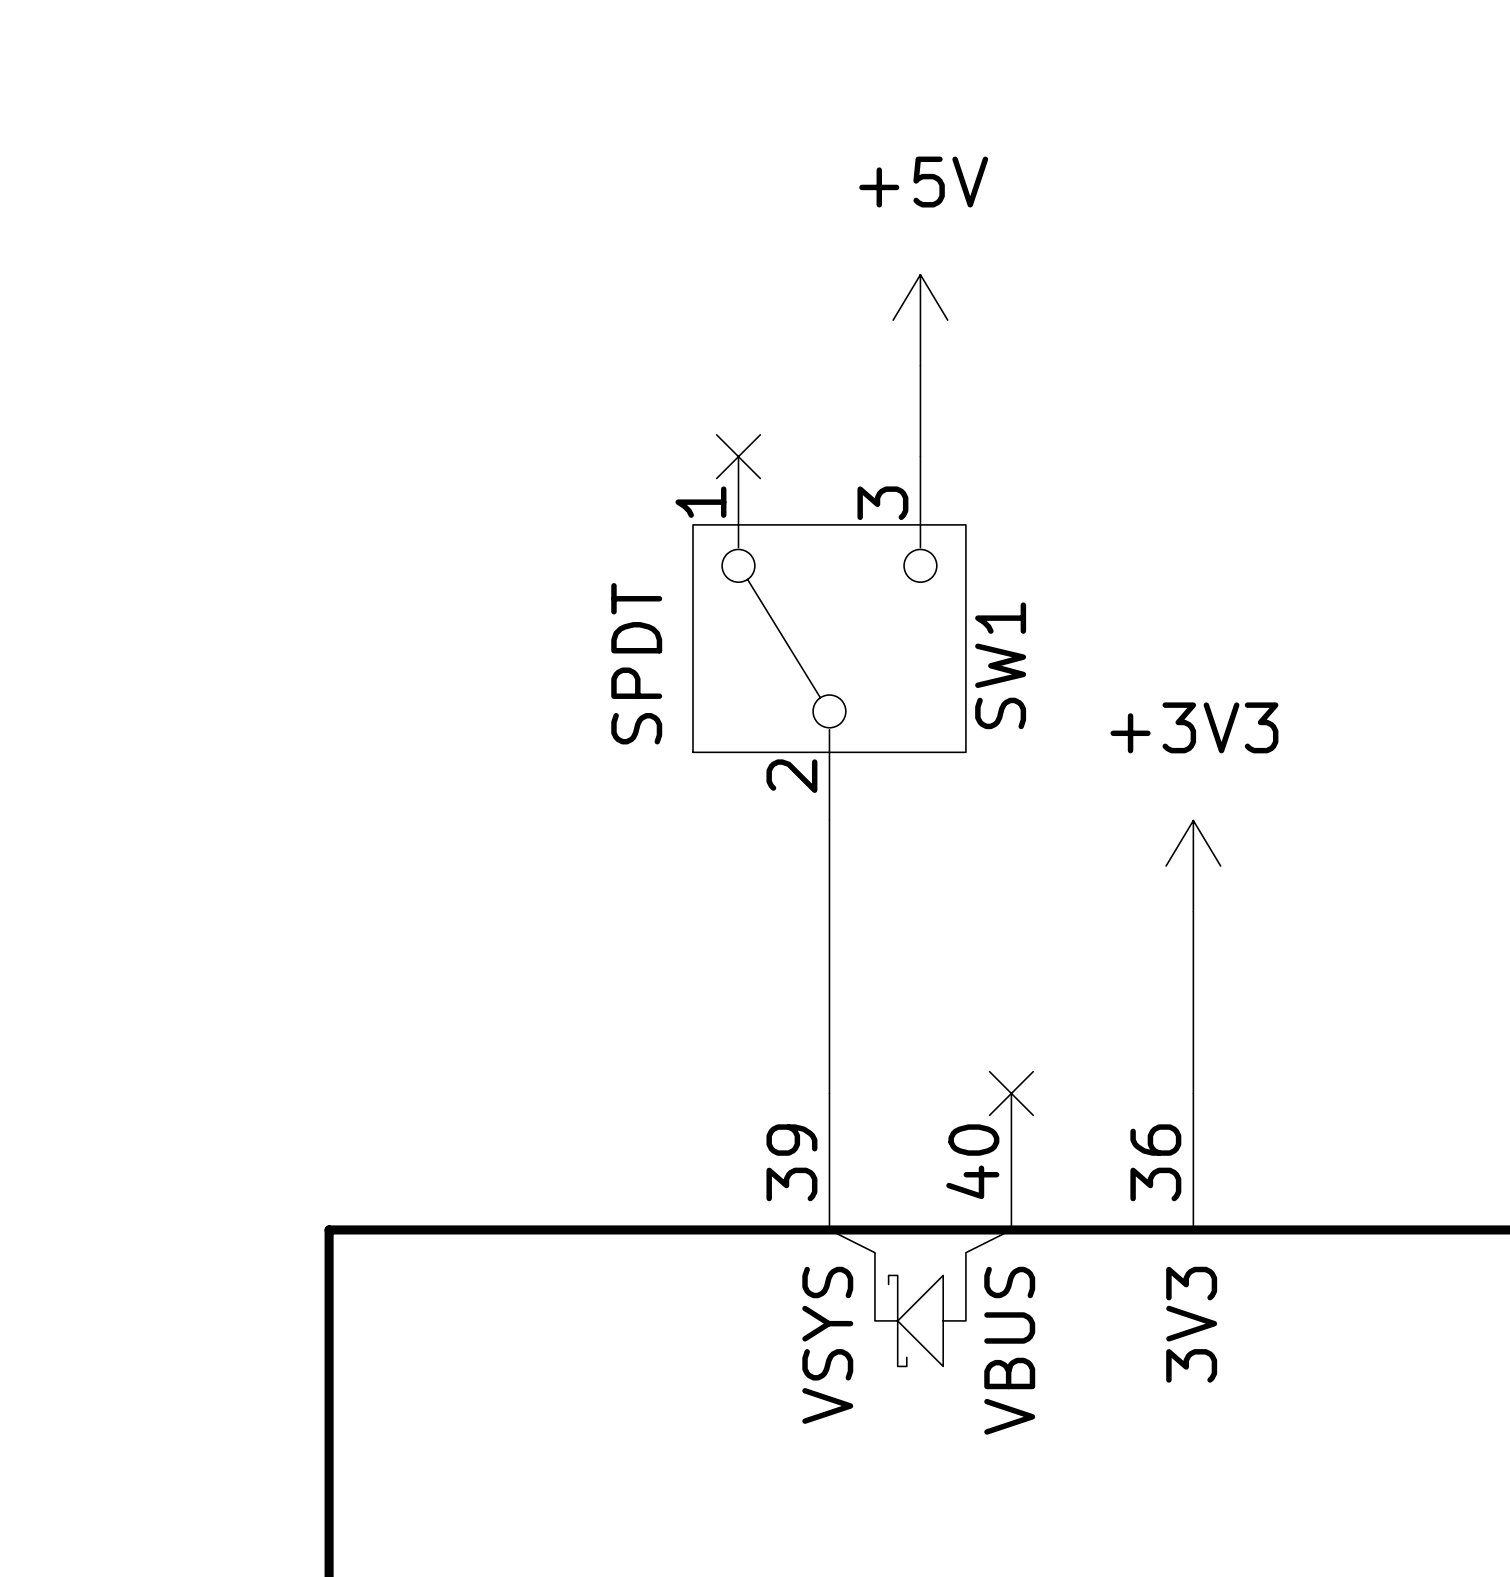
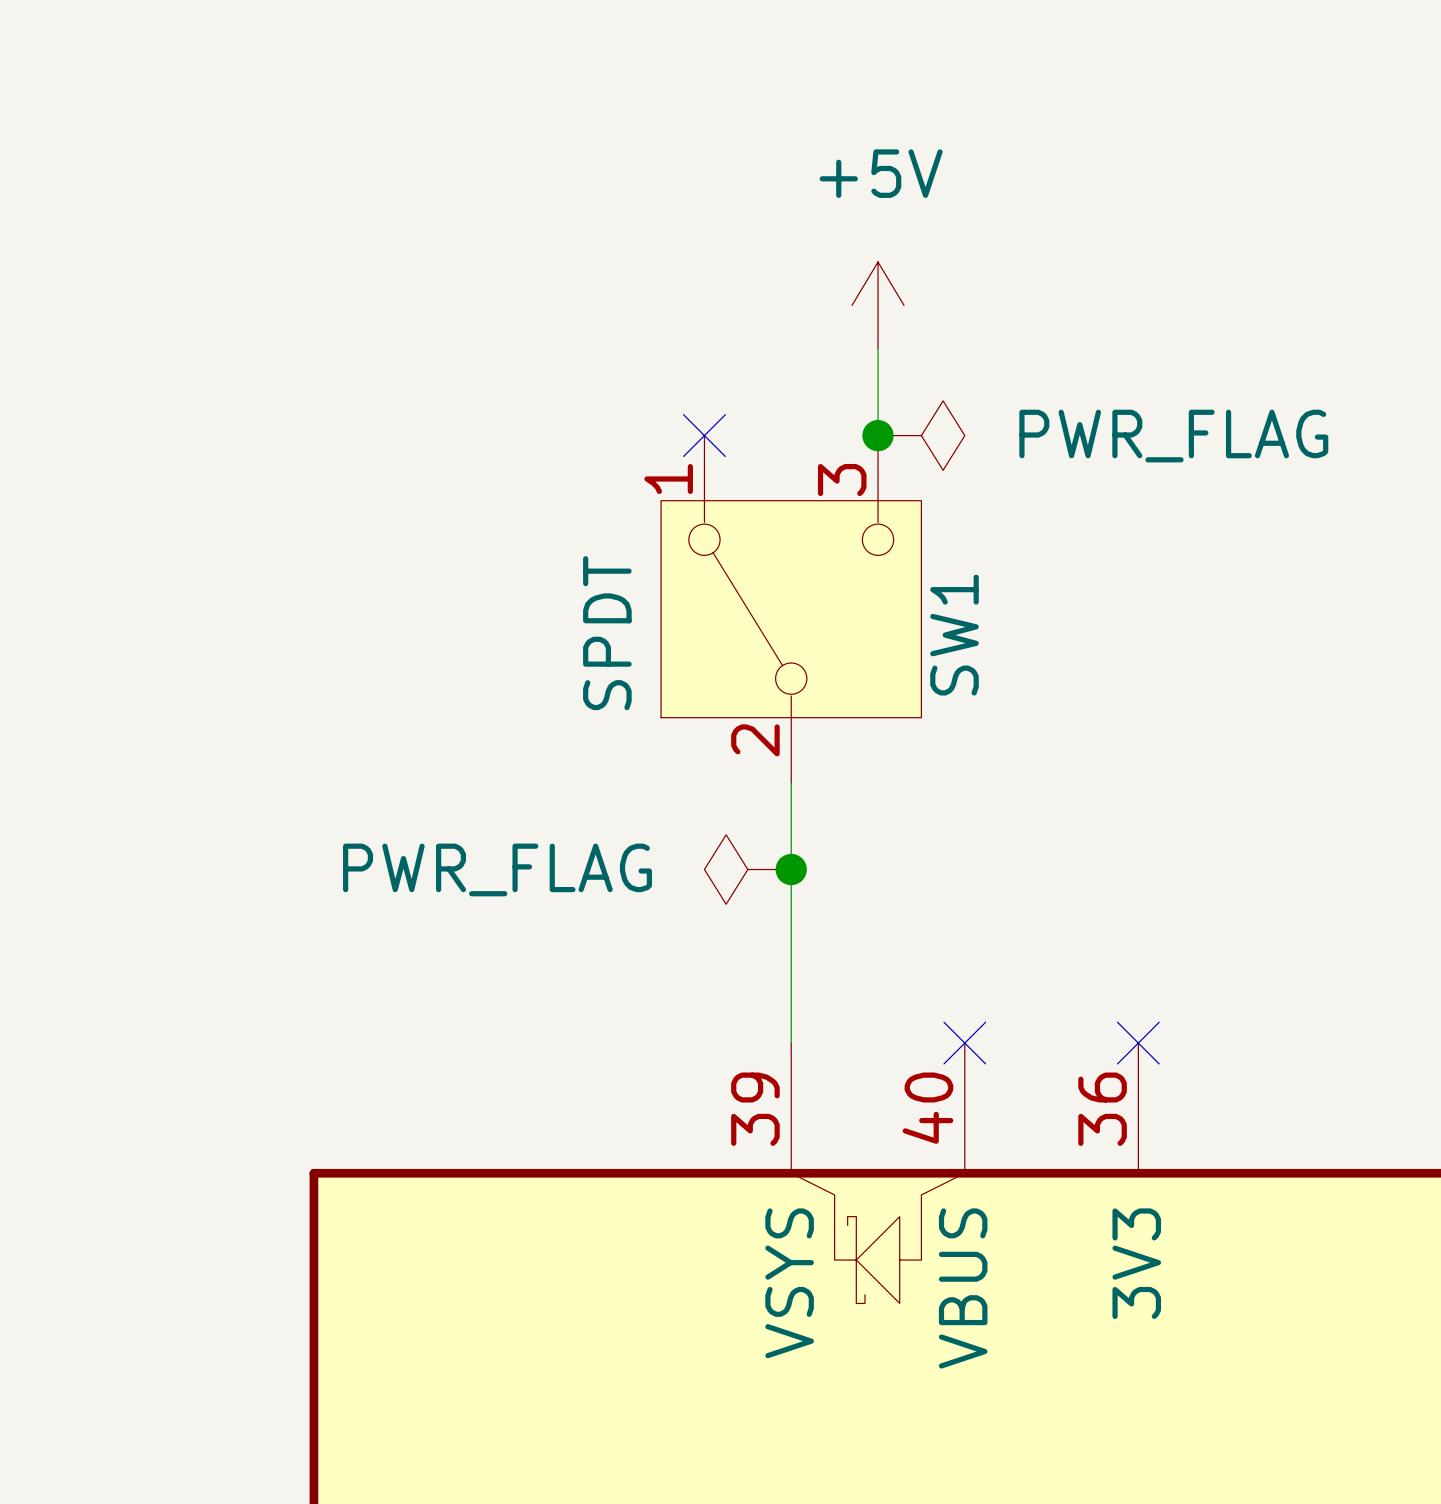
junction: none -> (878, 435)
power symbol: none -> PWR_FLAG (921, 435)
power symbol: +3V3 (1193, 866) -> none
power symbol: none -> PWR_FLAG (747, 869)
junction: none -> (791, 869)
wire: (1193, 911) (1193, 1093) -> none
no-connect mark: none -> (1138, 1043)

